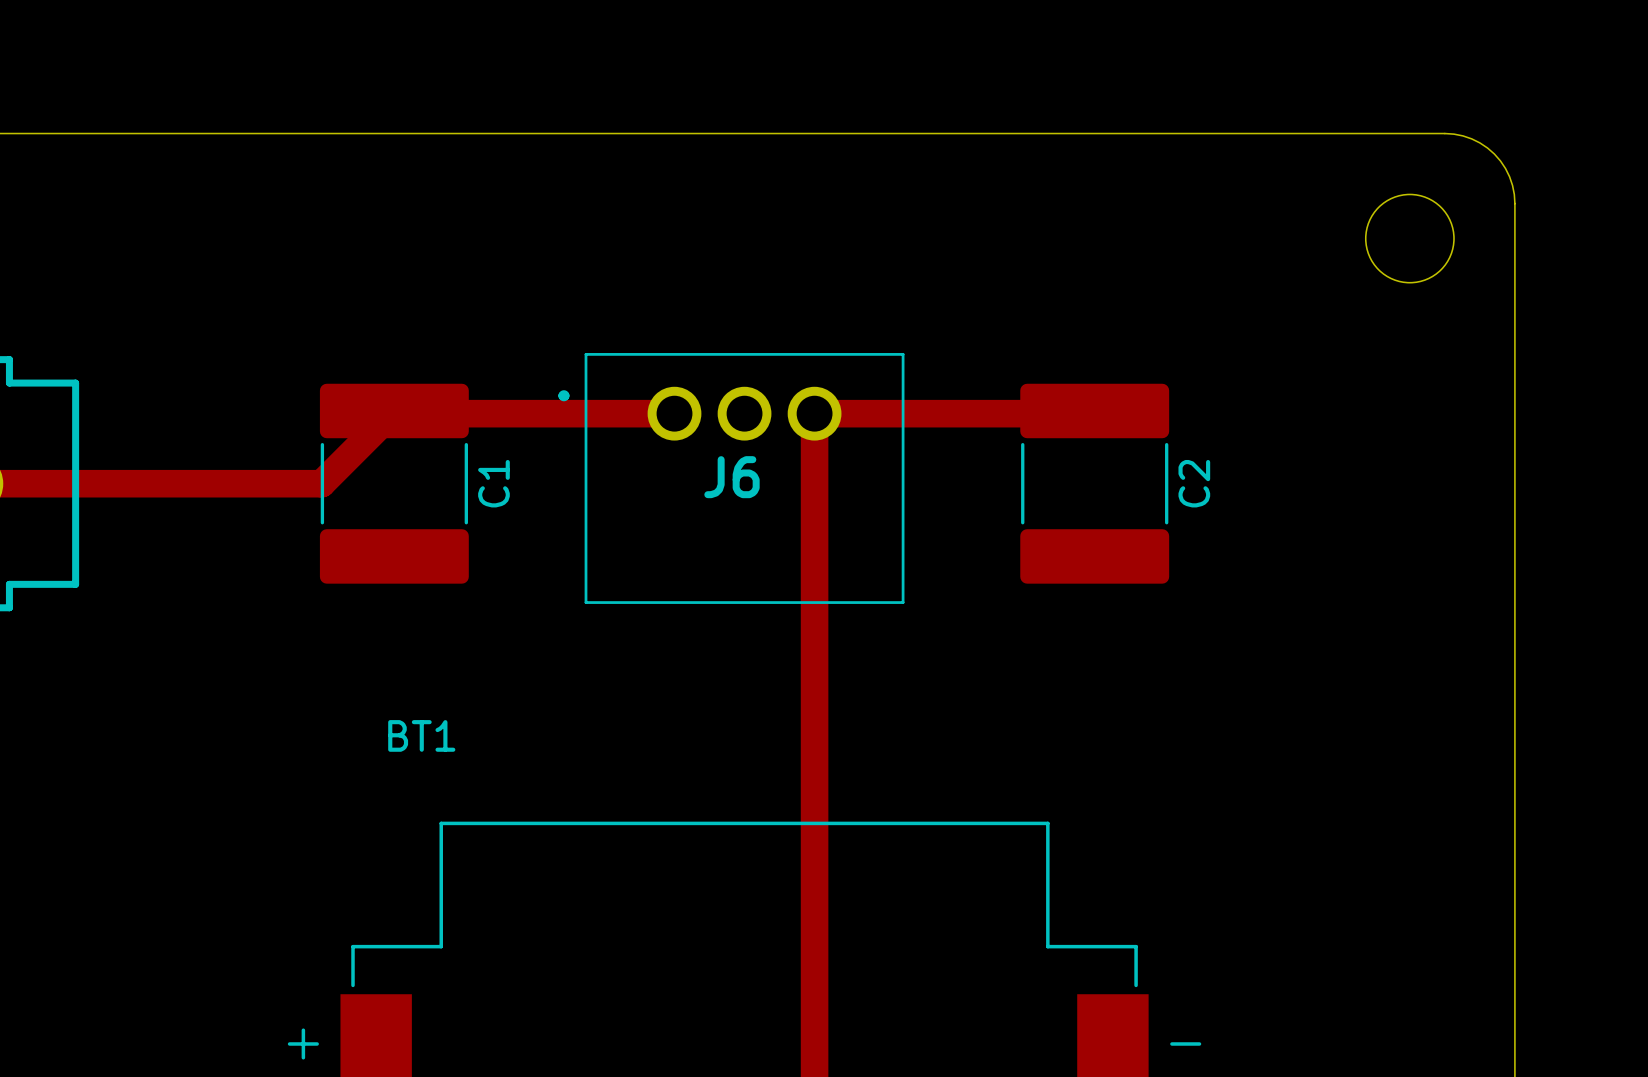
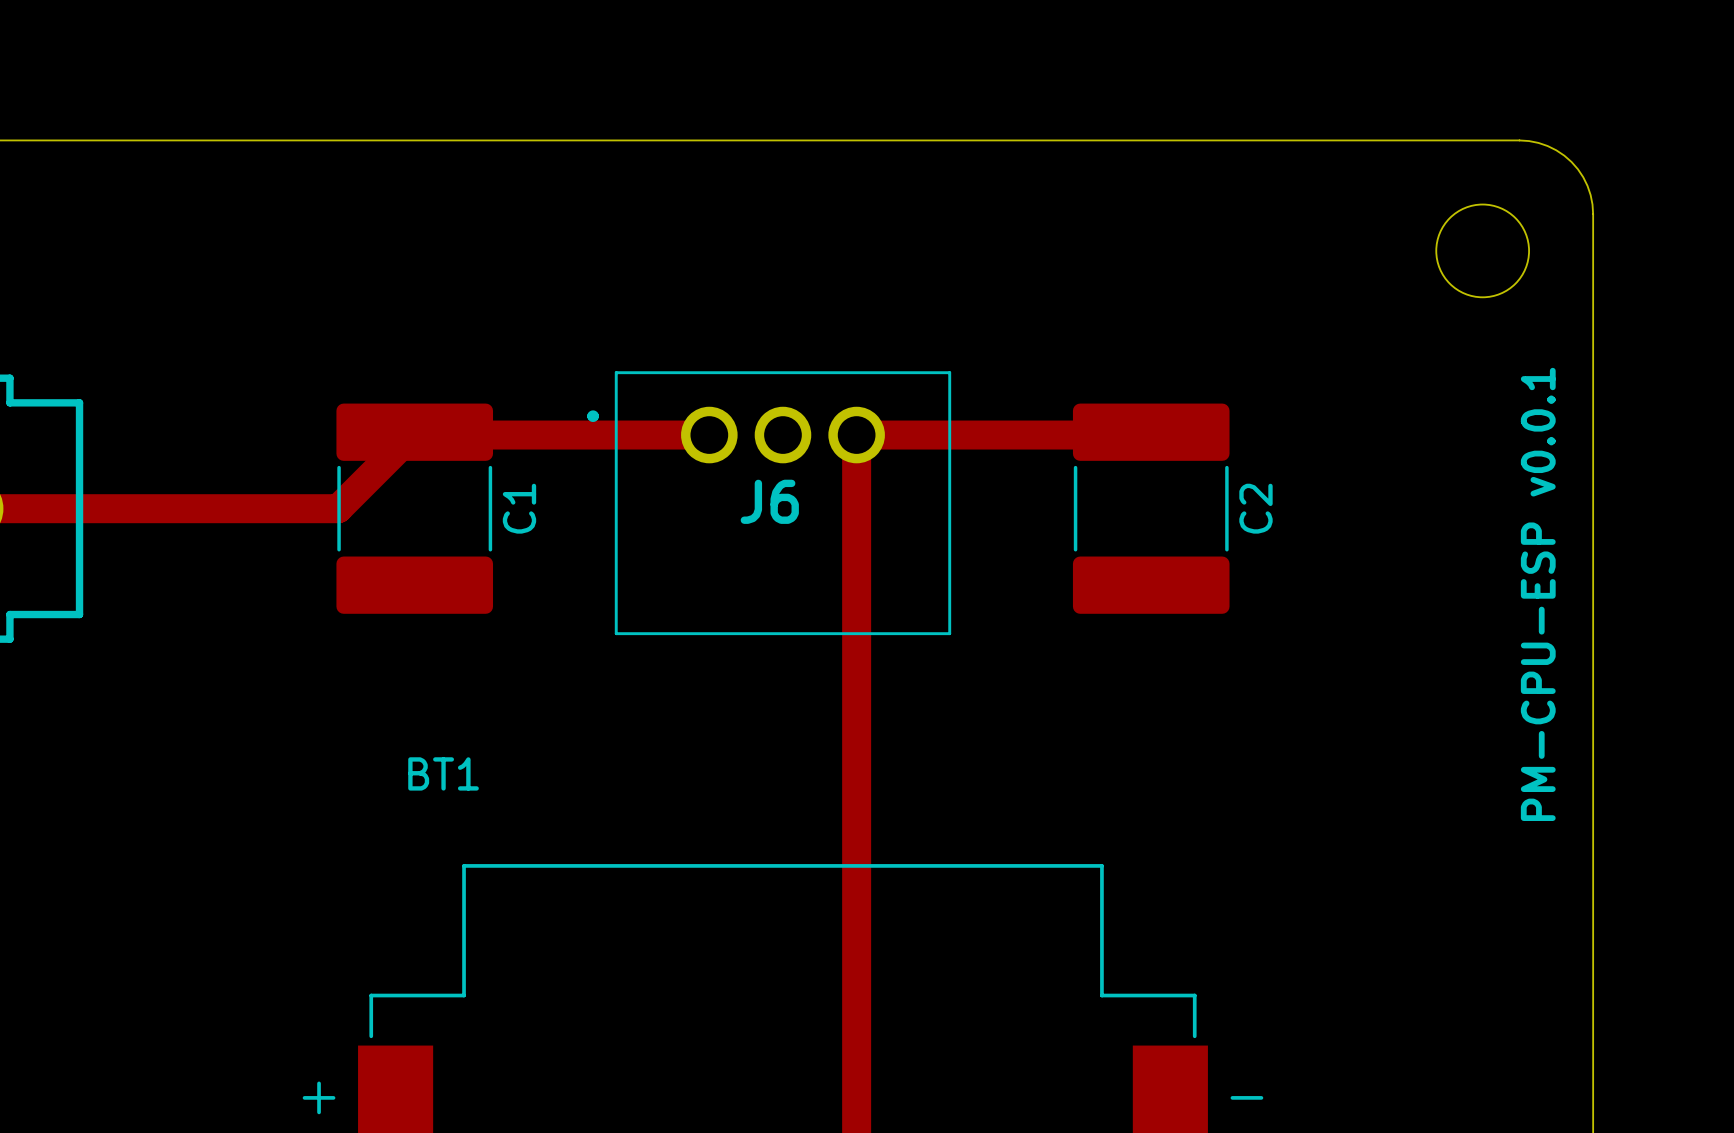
text: none -> PM-CPU-ESP v0.0.1 (1538, 594)

